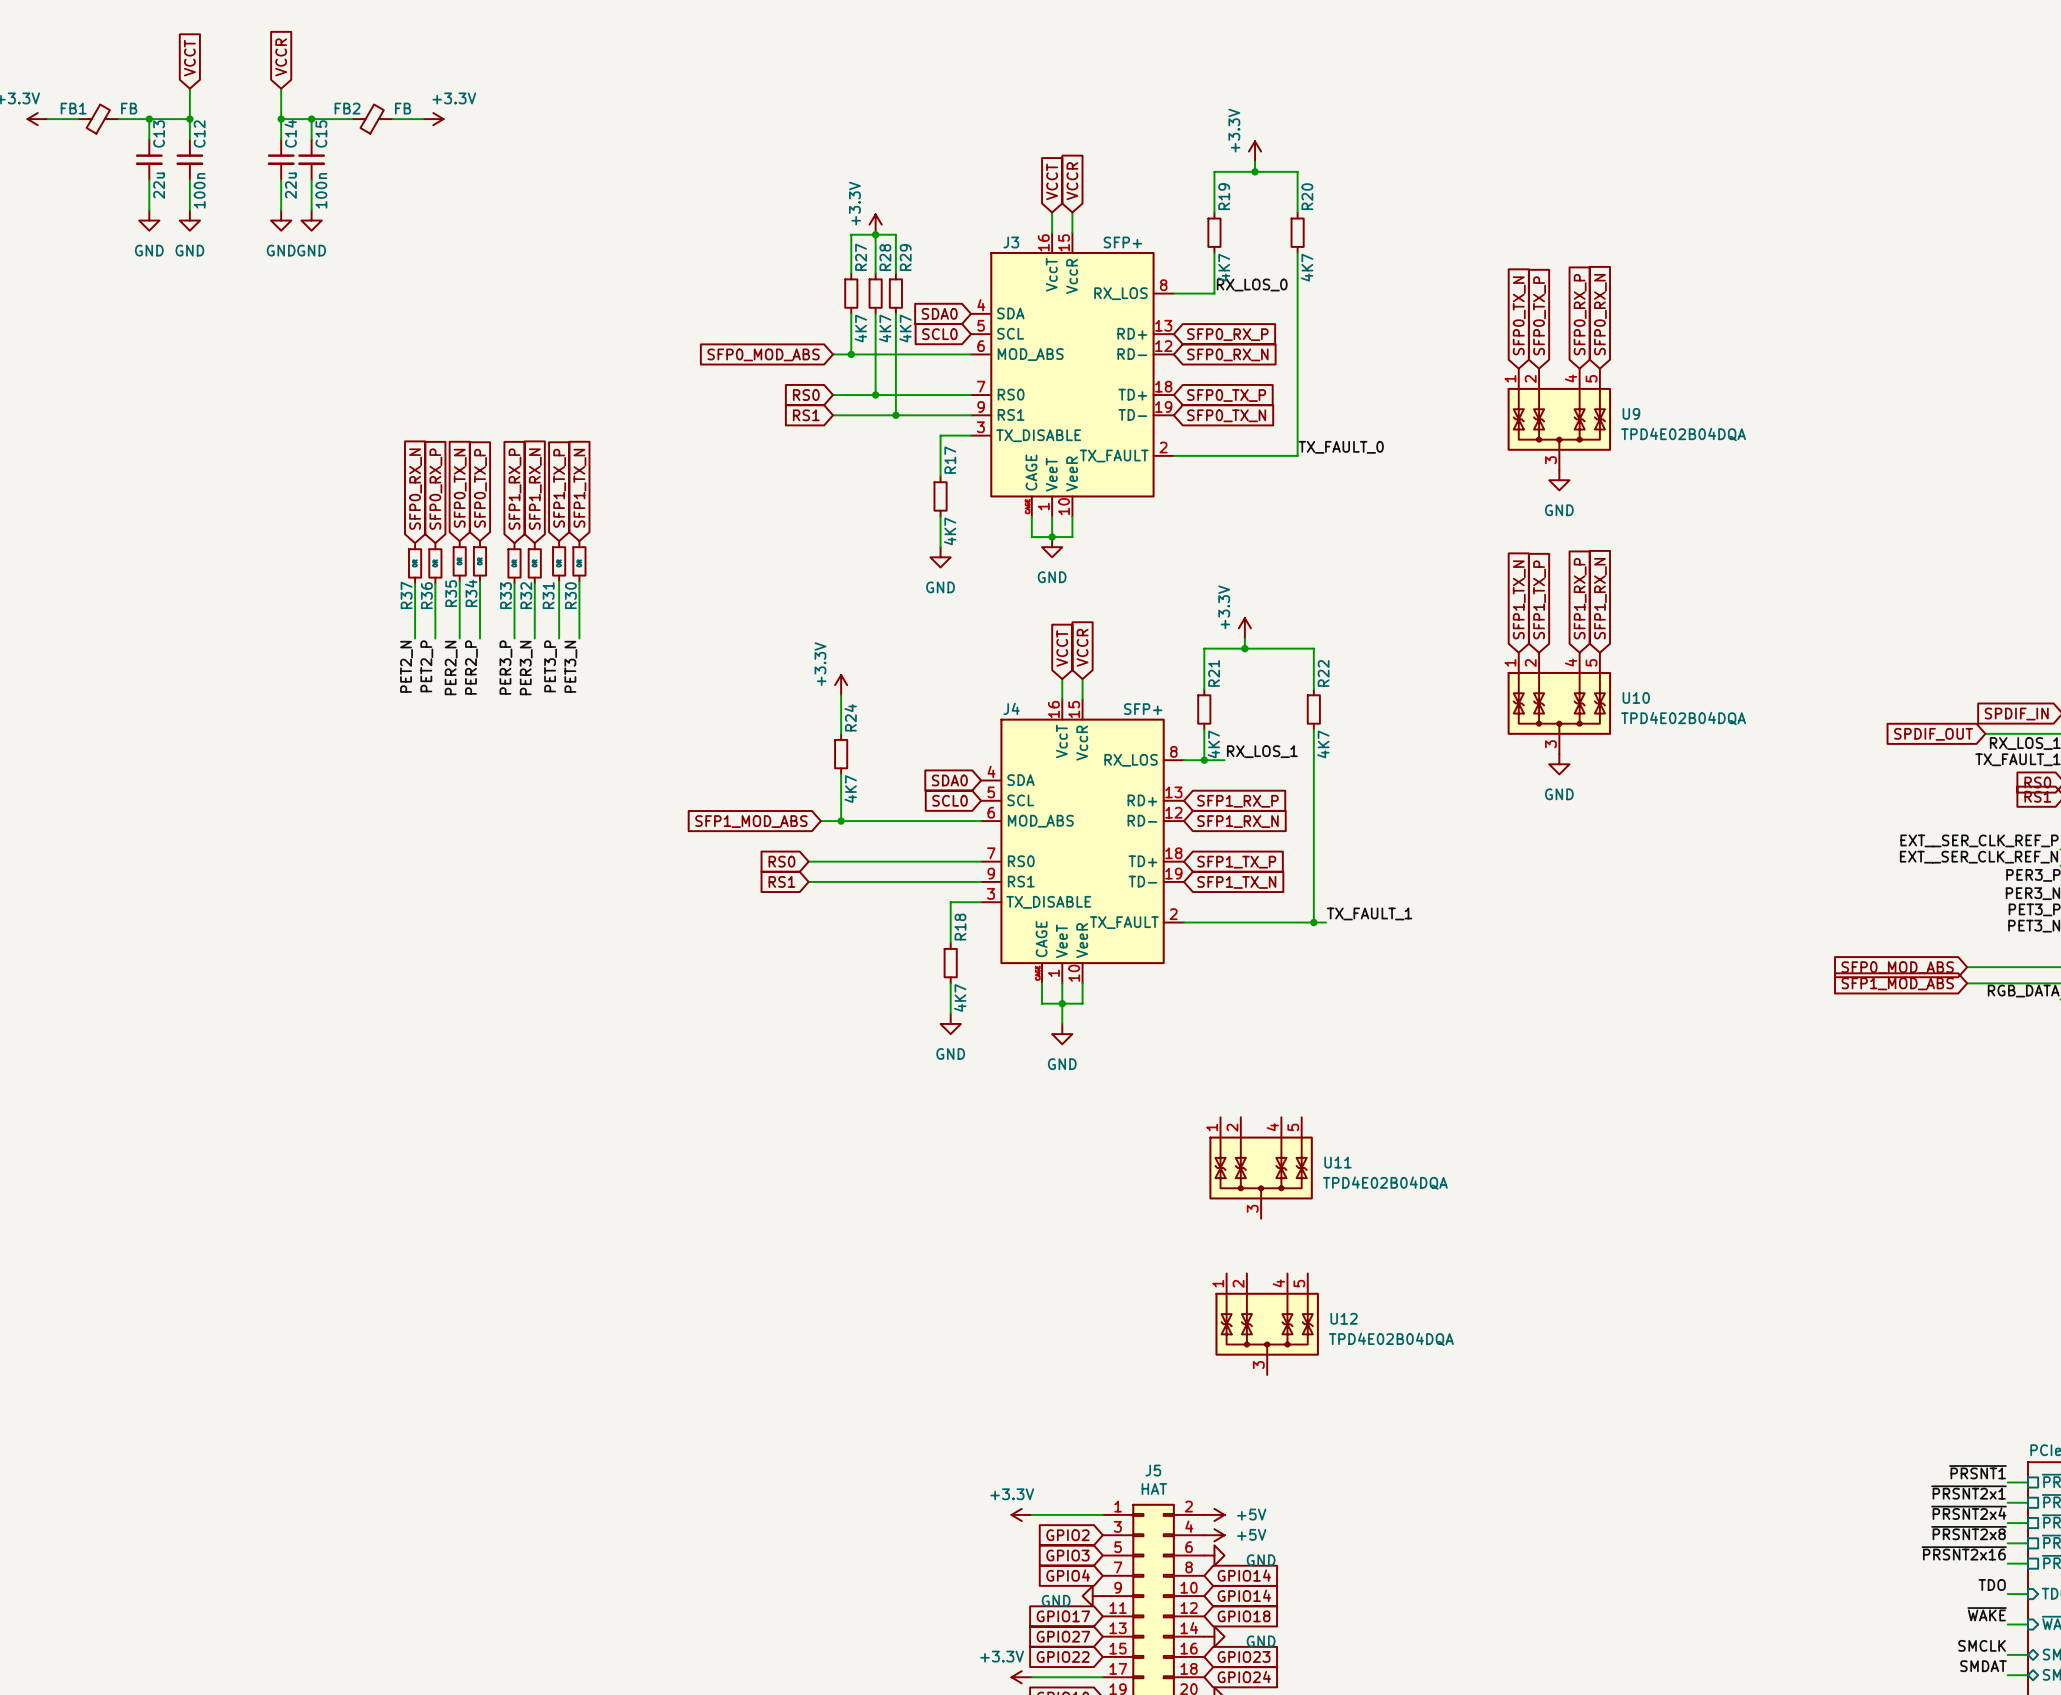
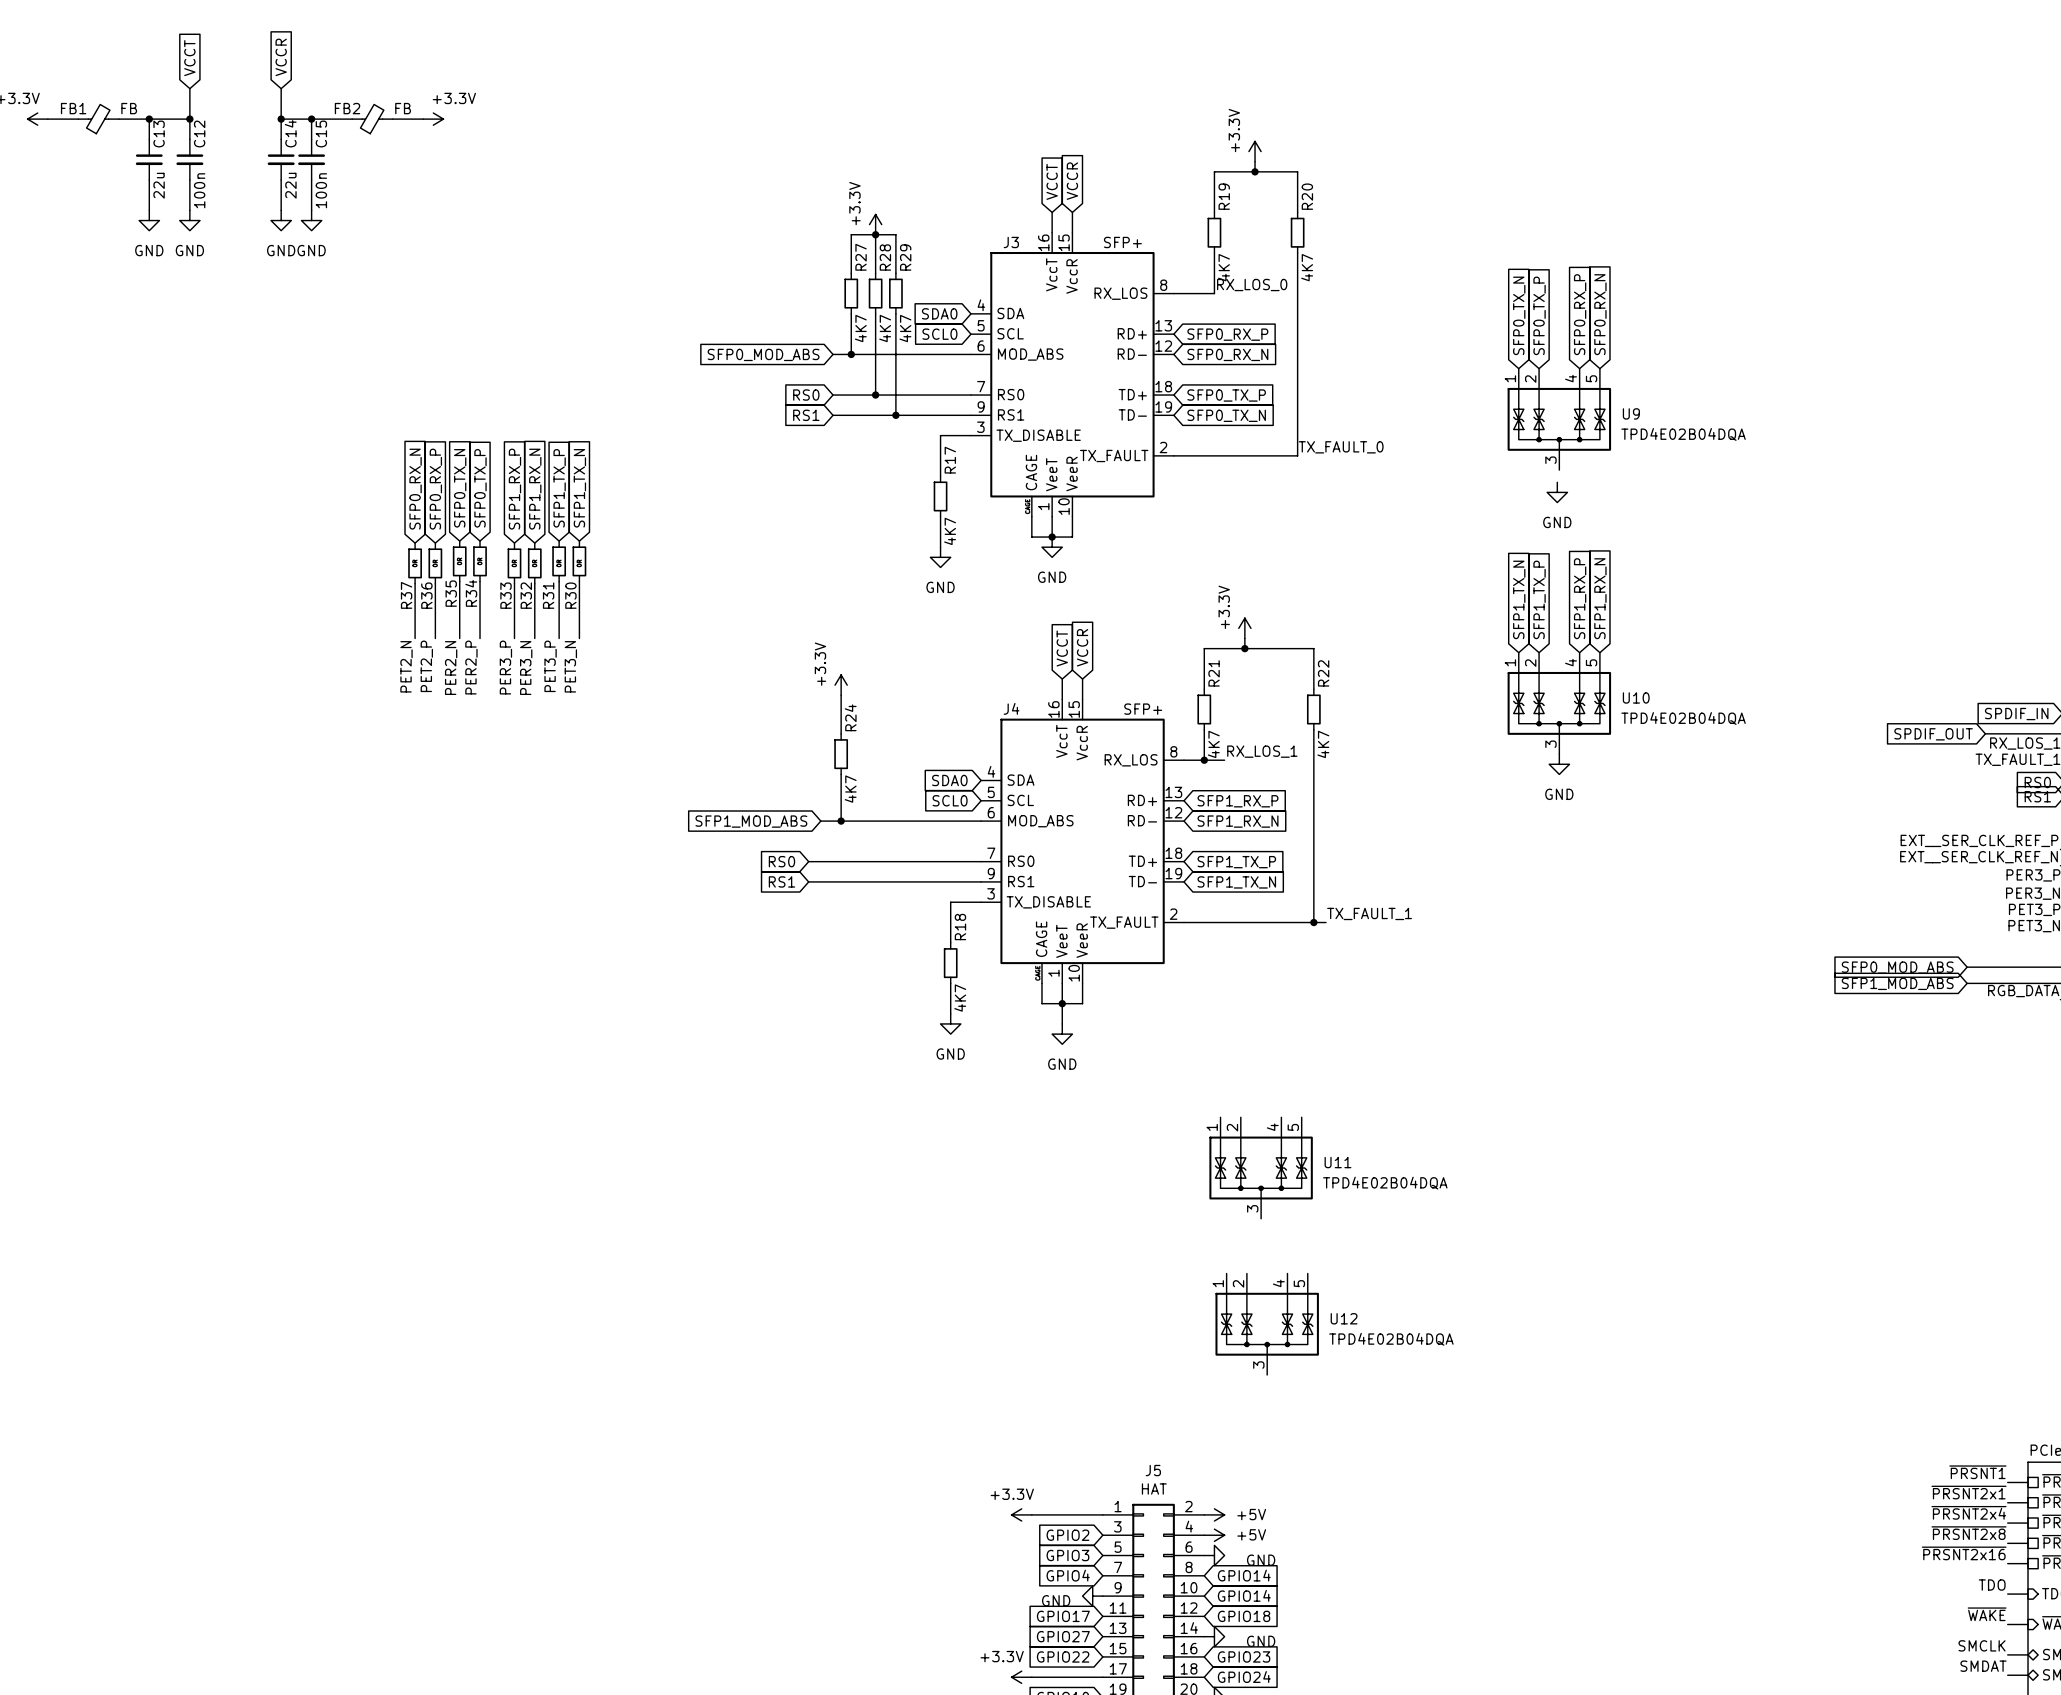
power symbol position: GND (1559, 480) -> GND (1557, 492)

